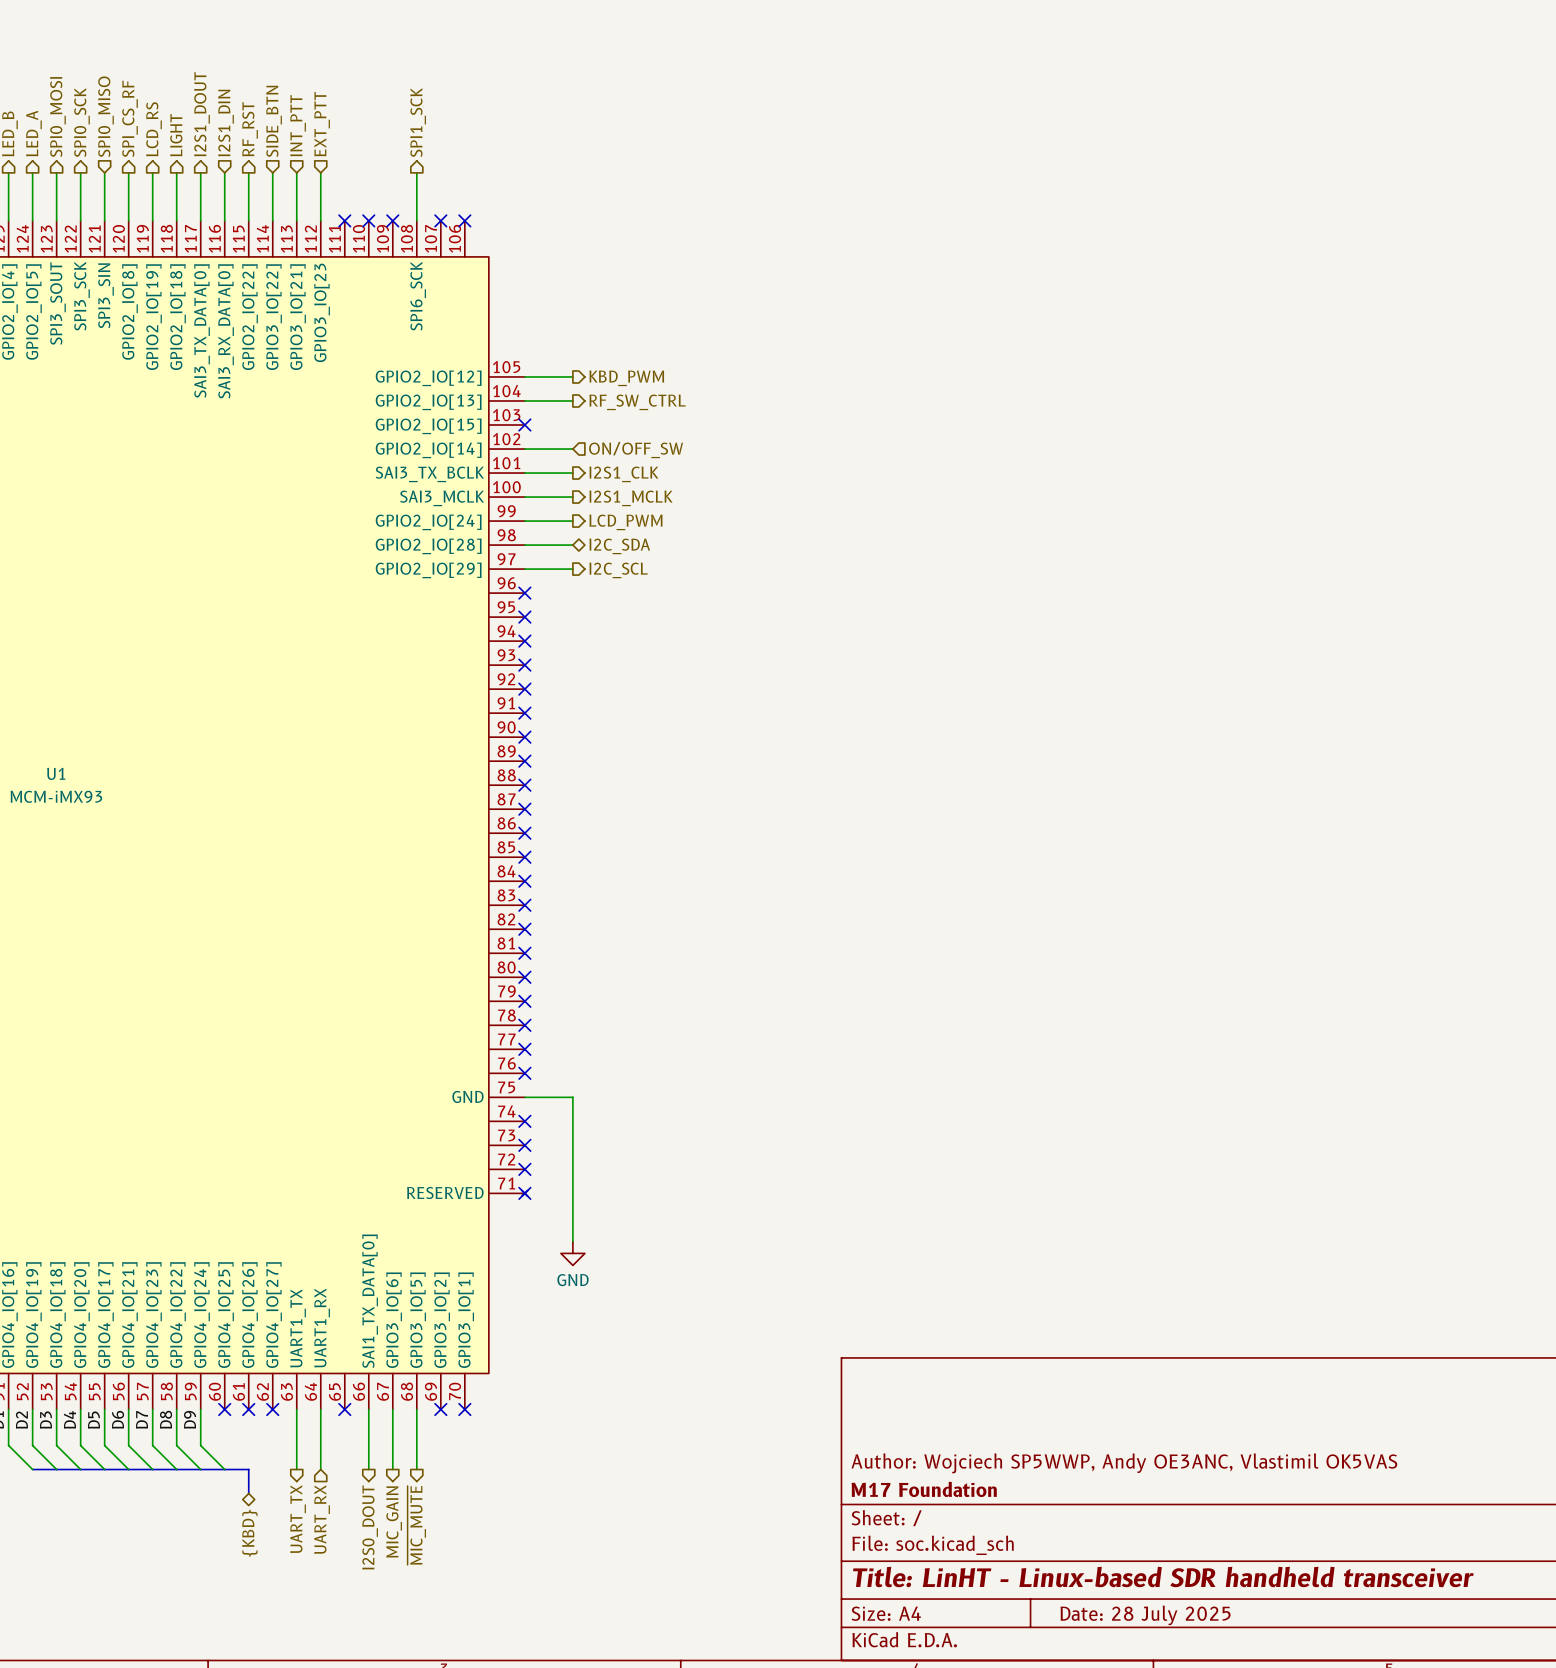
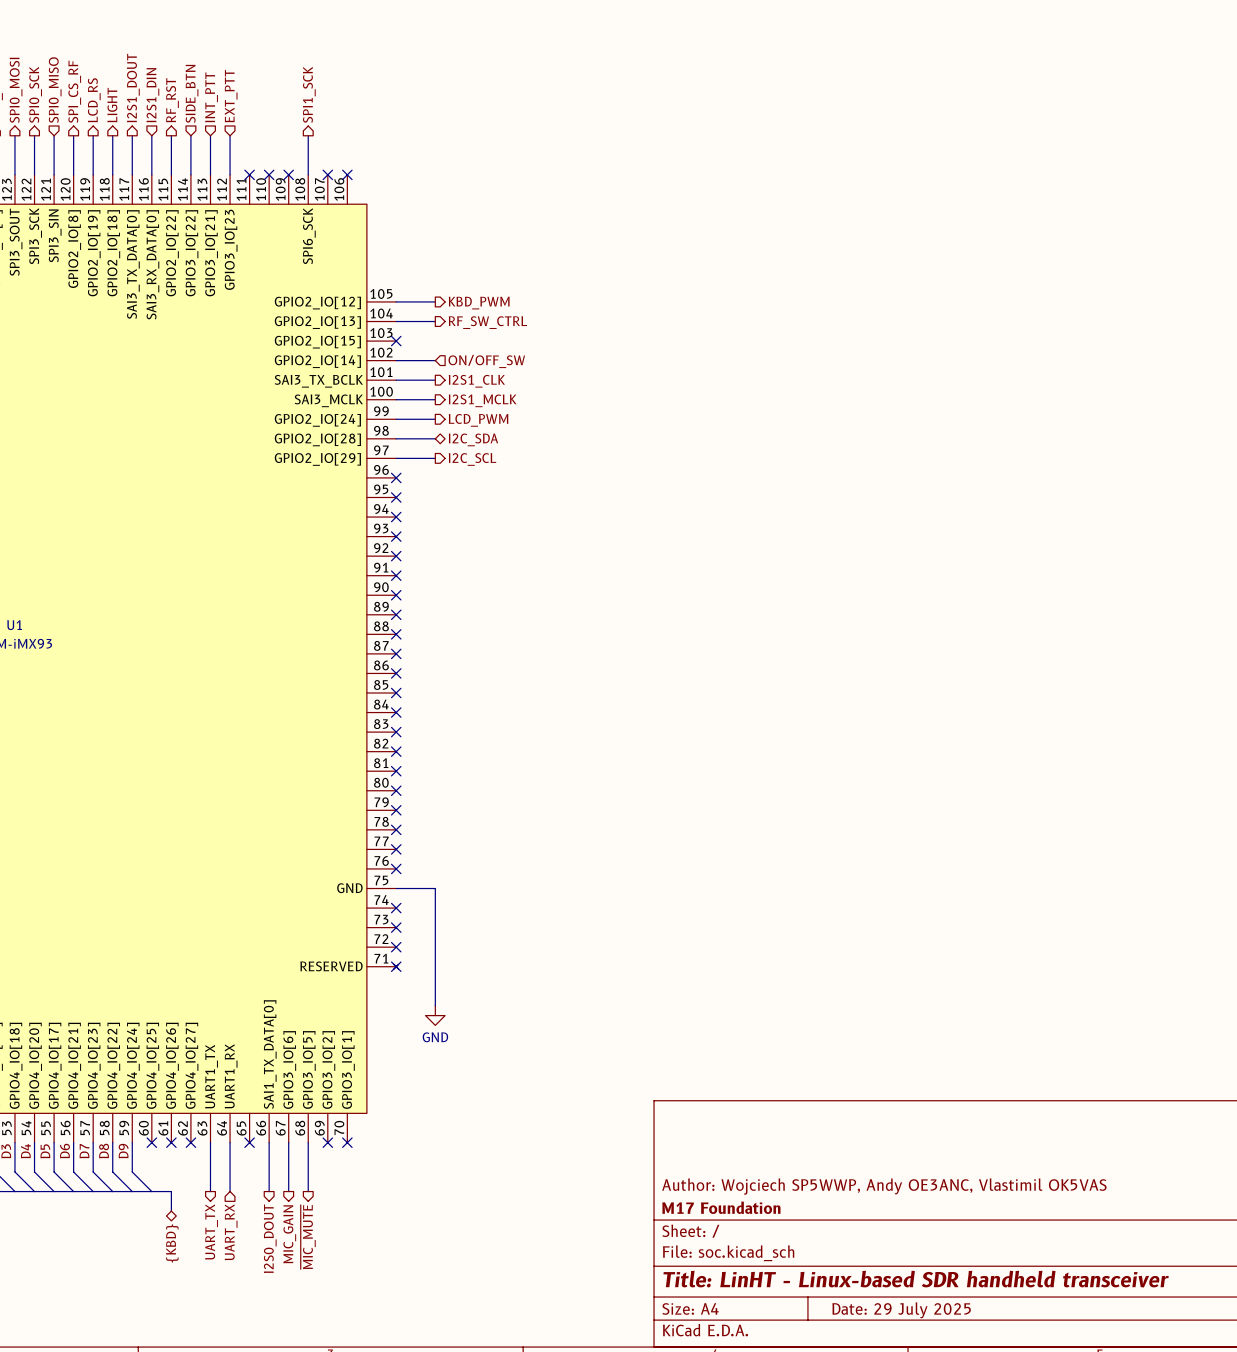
title block: Date: 28 July 2025 (1145, 1615) -> Date: 29 July 2025 (901, 1310)

